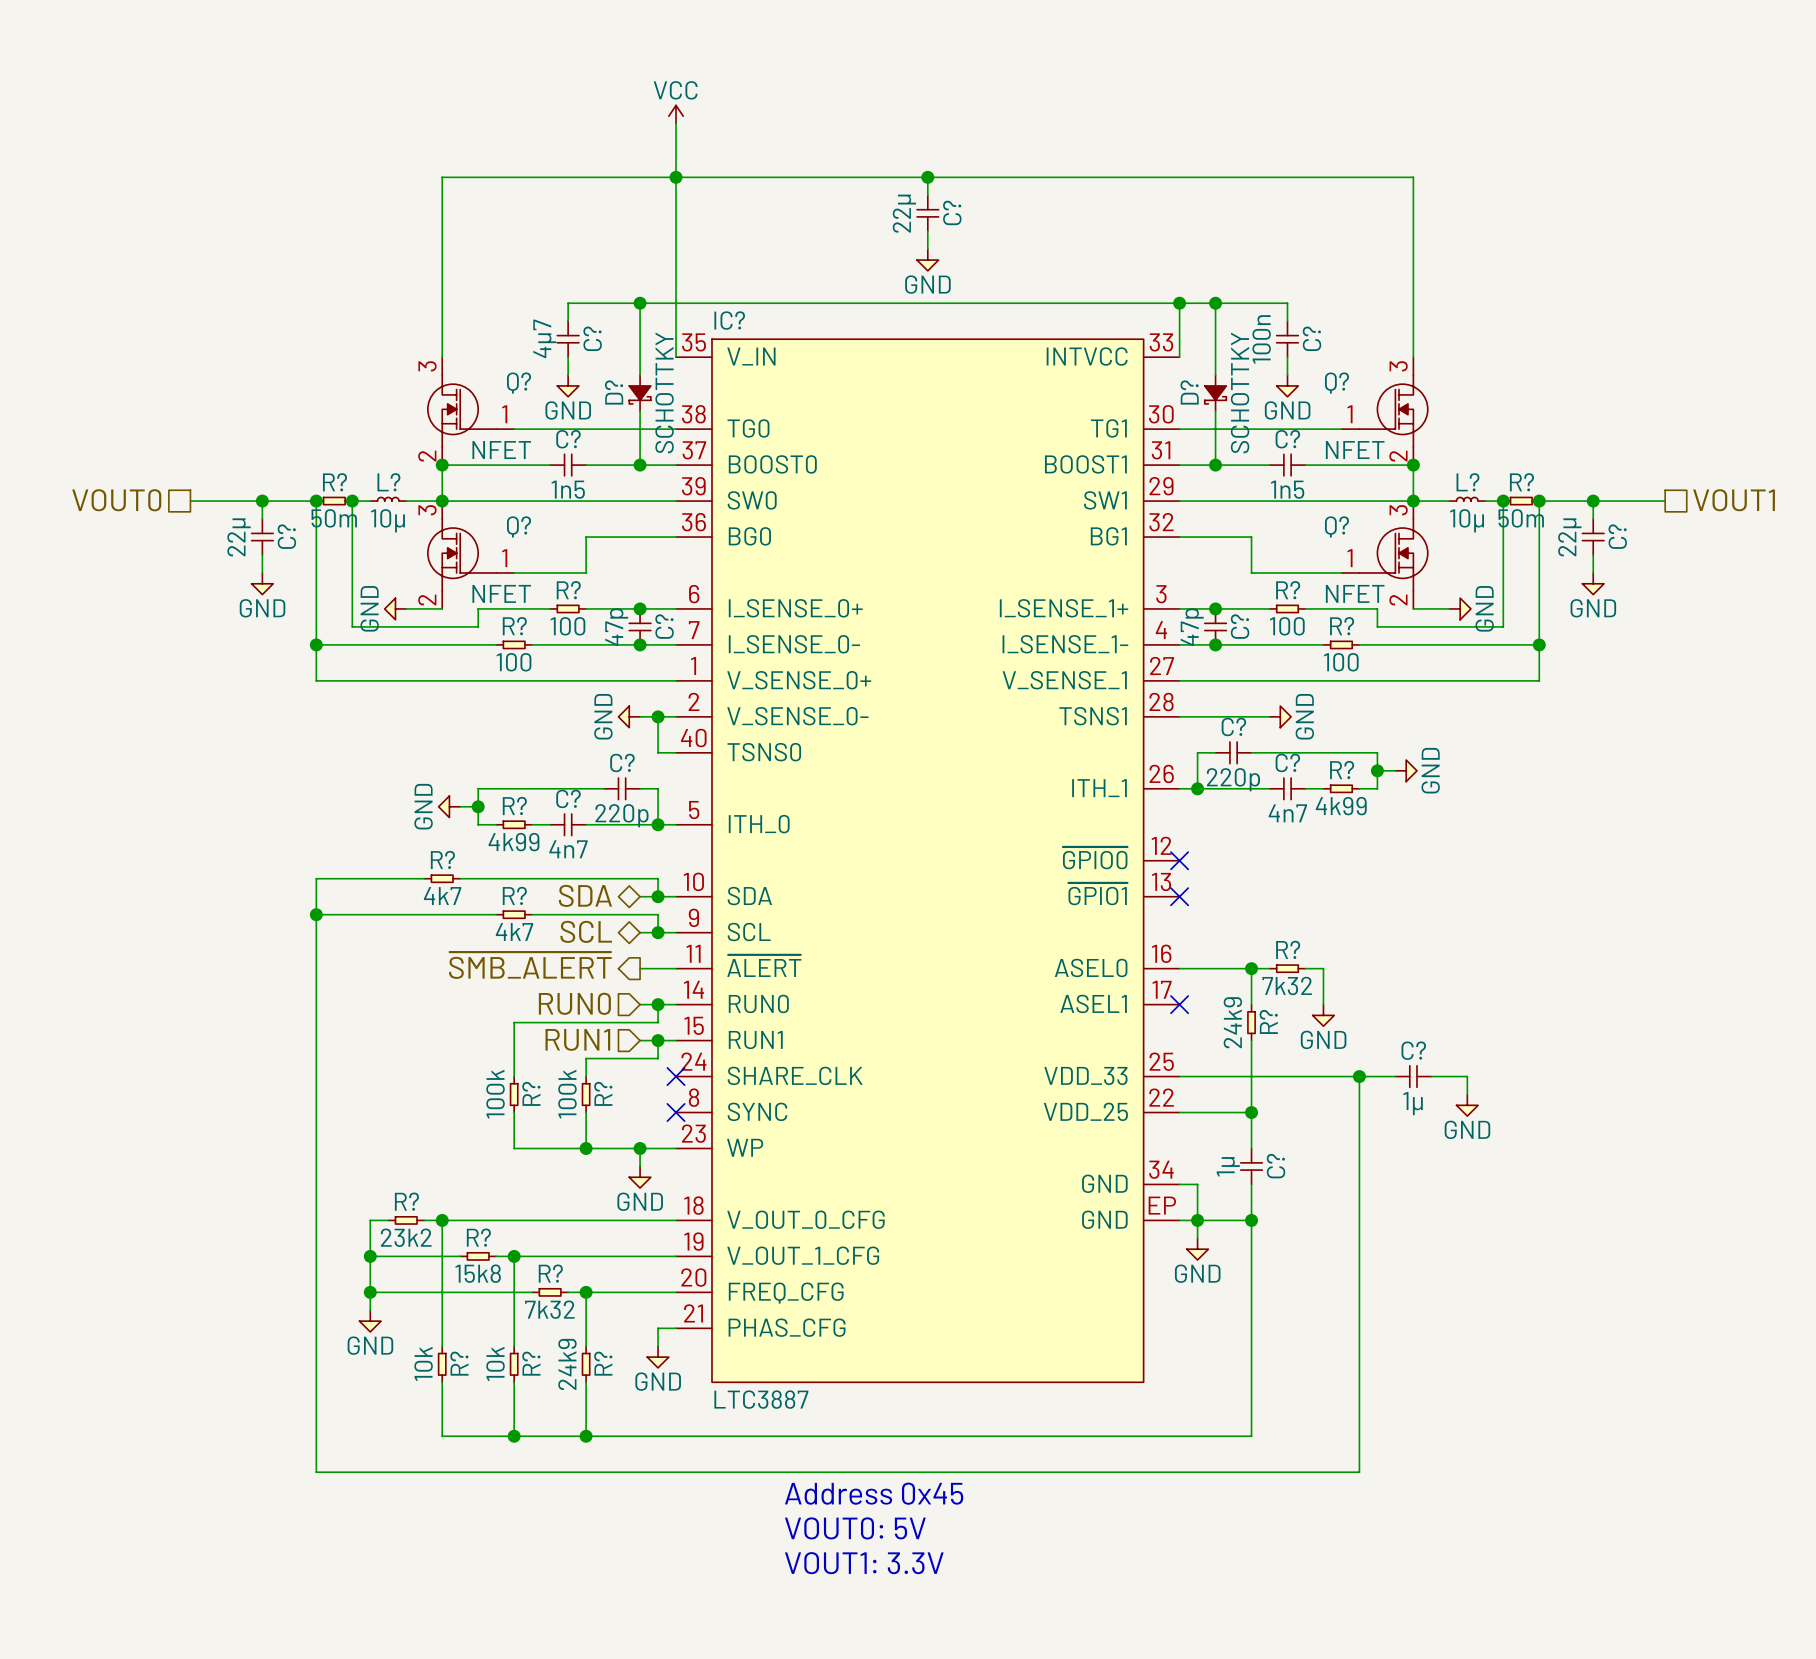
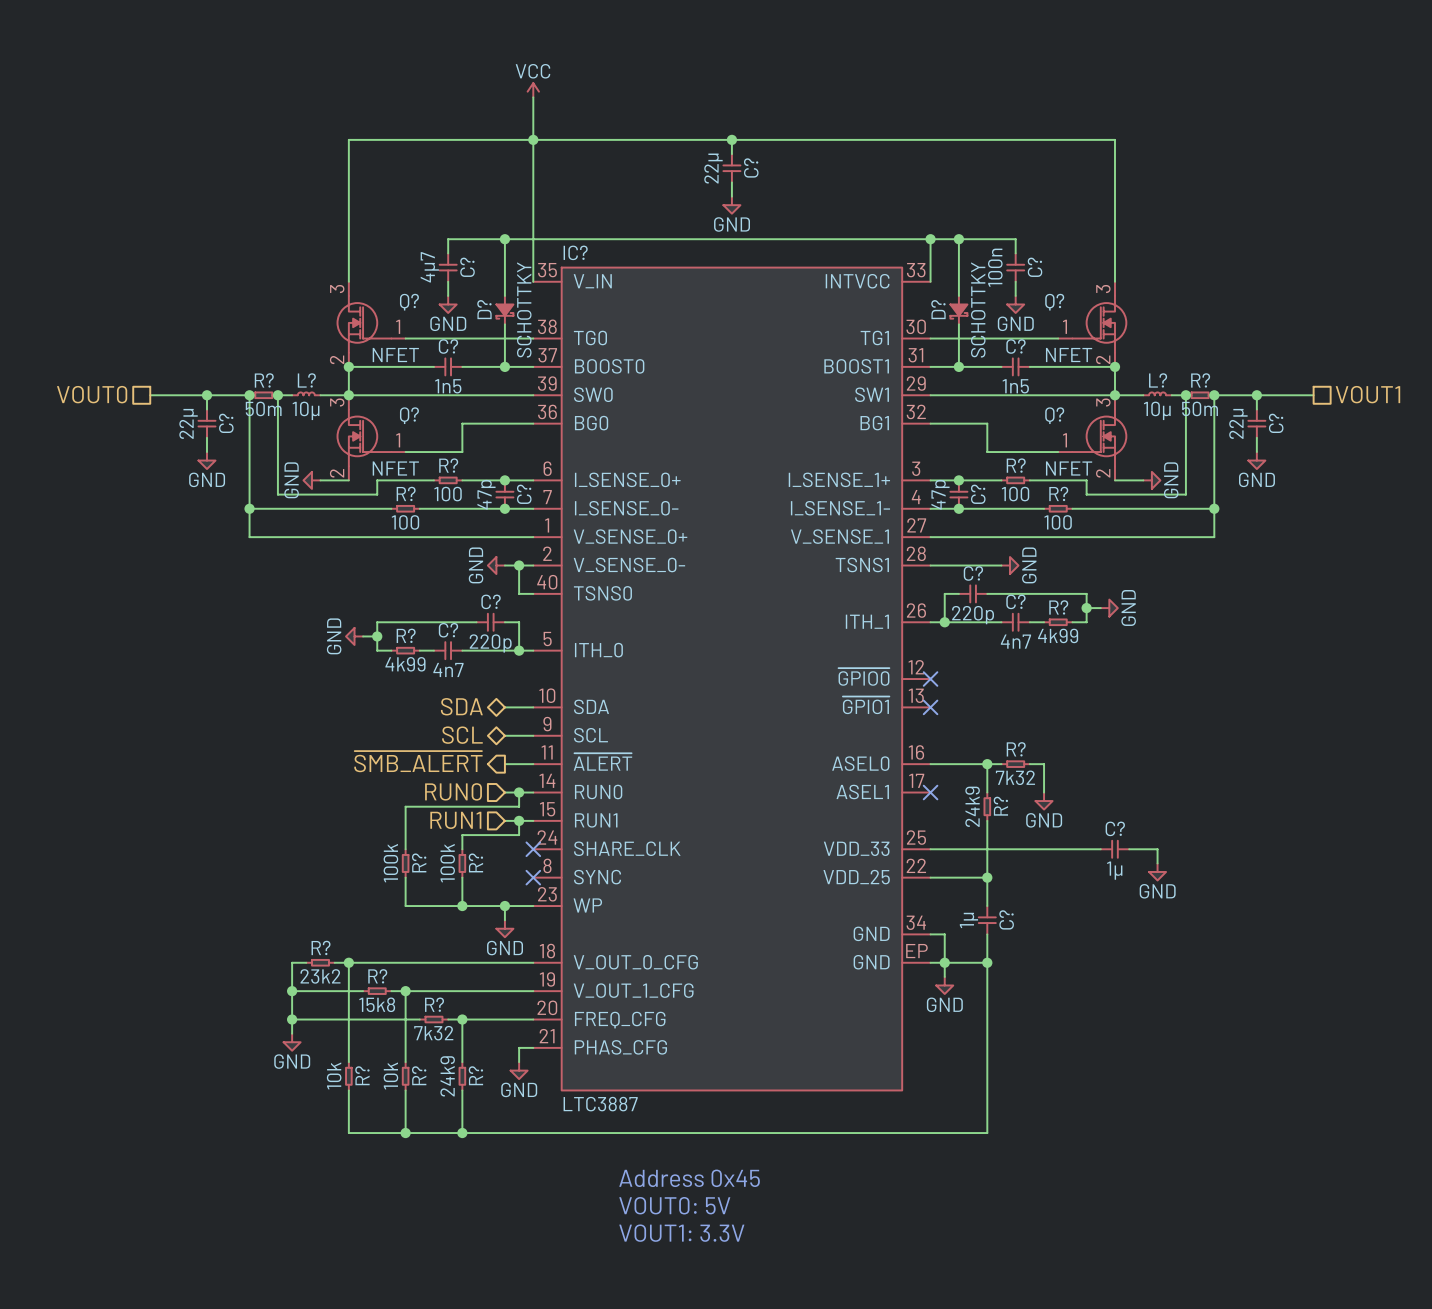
wire: (424, 878) (316, 878) (316, 1472) (1359, 1472) (1359, 1076) -> none
R?: 4k7 (442, 878) -> none
wire: (460, 878) (658, 878) (658, 896) -> none
junction: (658, 896) -> none
wire: (316, 914) (496, 914) -> none
junction: (316, 914) -> none
R?: 4k7 (514, 914) -> none
wire: (532, 914) (658, 914) (658, 932) -> none
junction: (658, 932) -> none
junction: (1359, 1076) -> none

